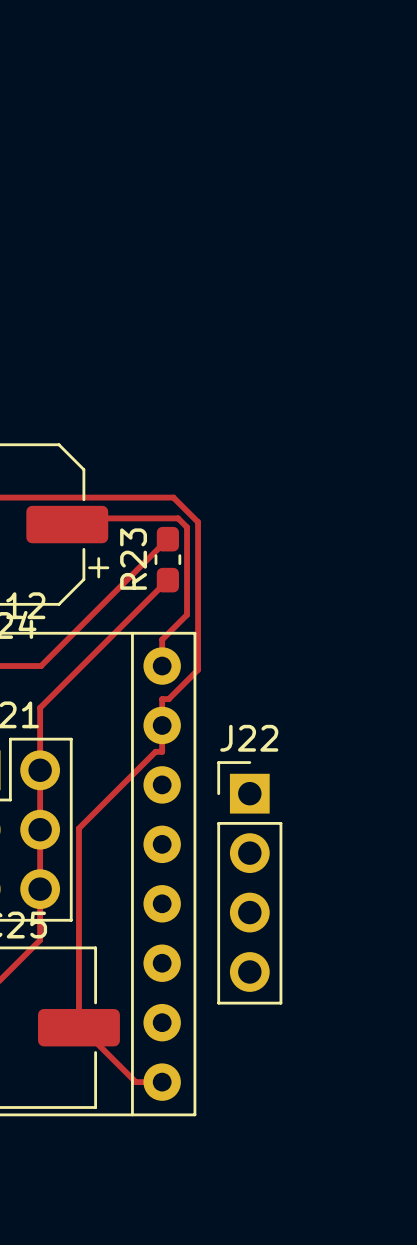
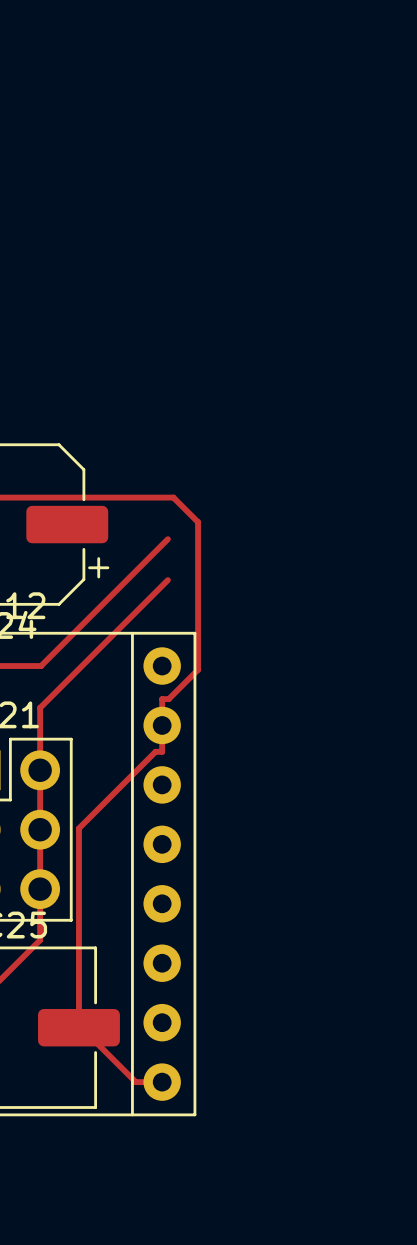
track: (67, 524) (73, 518) (178, 518) (187, 527) (187, 614) (162, 639) (162, 666) -> none
R23: (167, 559) -> none
J22: (249, 882) -> none

